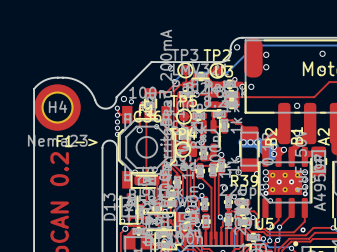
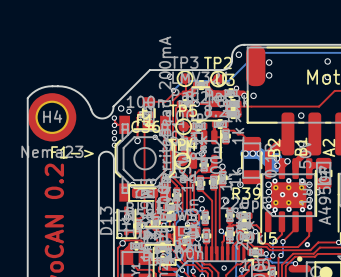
via: none -> (274, 181)
via: none -> (288, 180)
via: none -> (302, 180)
via: none -> (275, 209)
via: none -> (289, 209)
via: none -> (302, 209)

